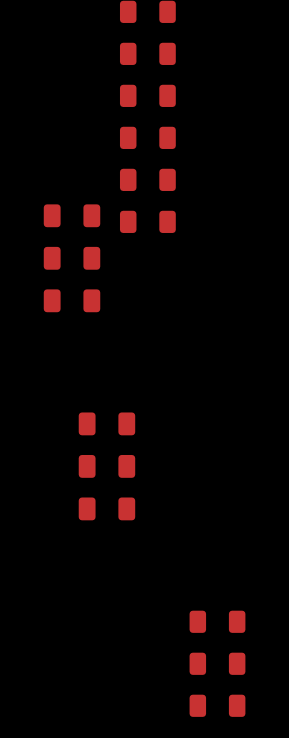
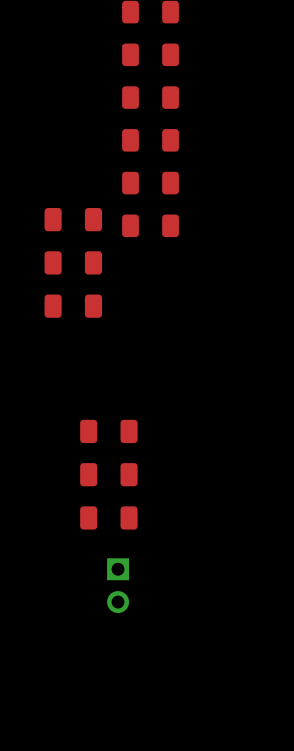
part: none -> (118, 585)
part: (217, 621) -> none
part: (217, 663) -> none
part: (217, 705) -> none

